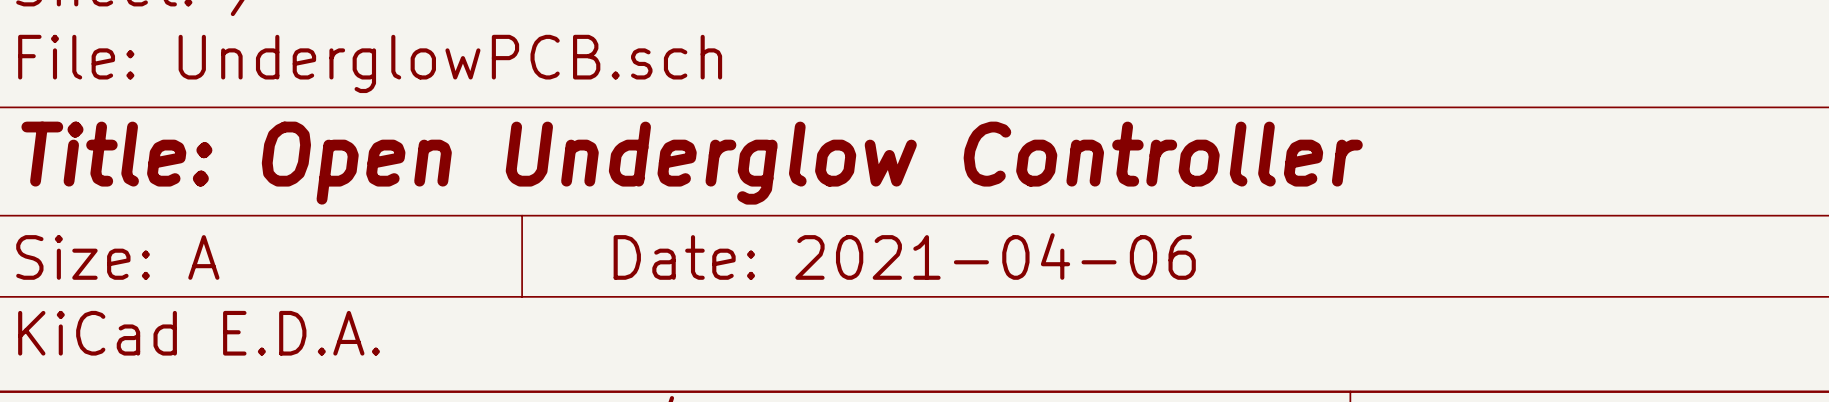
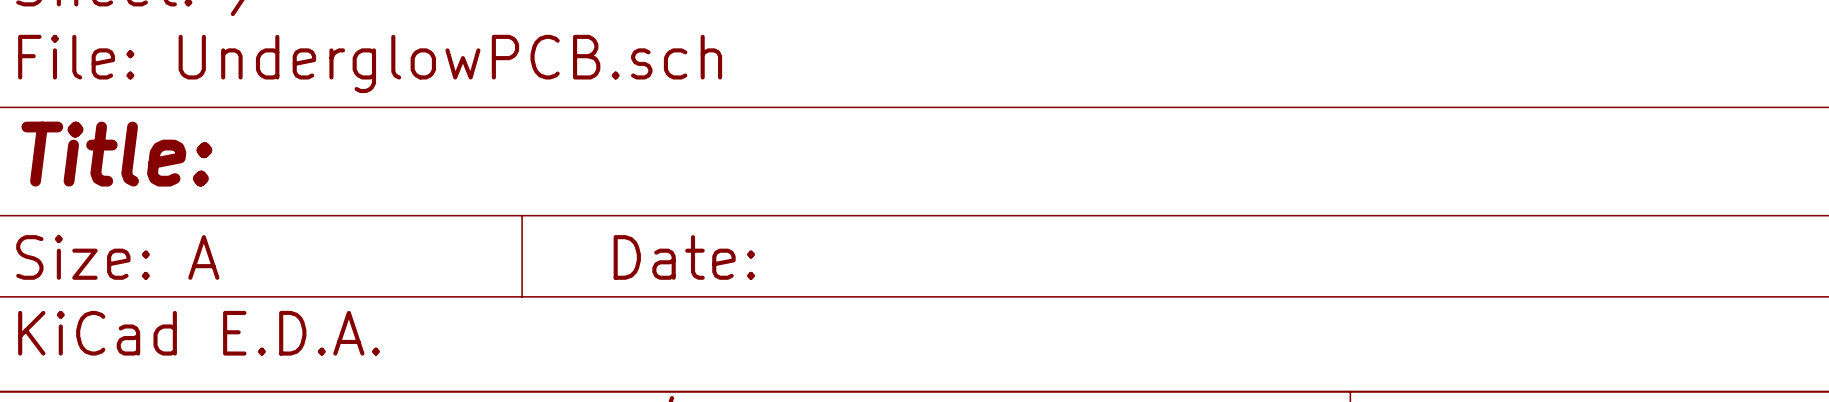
title block: Title: Open Underglow Controller (692, 163) -> Title: (116, 154)
title block: Date: 2021-04-06 (904, 256) -> Date: (684, 257)

